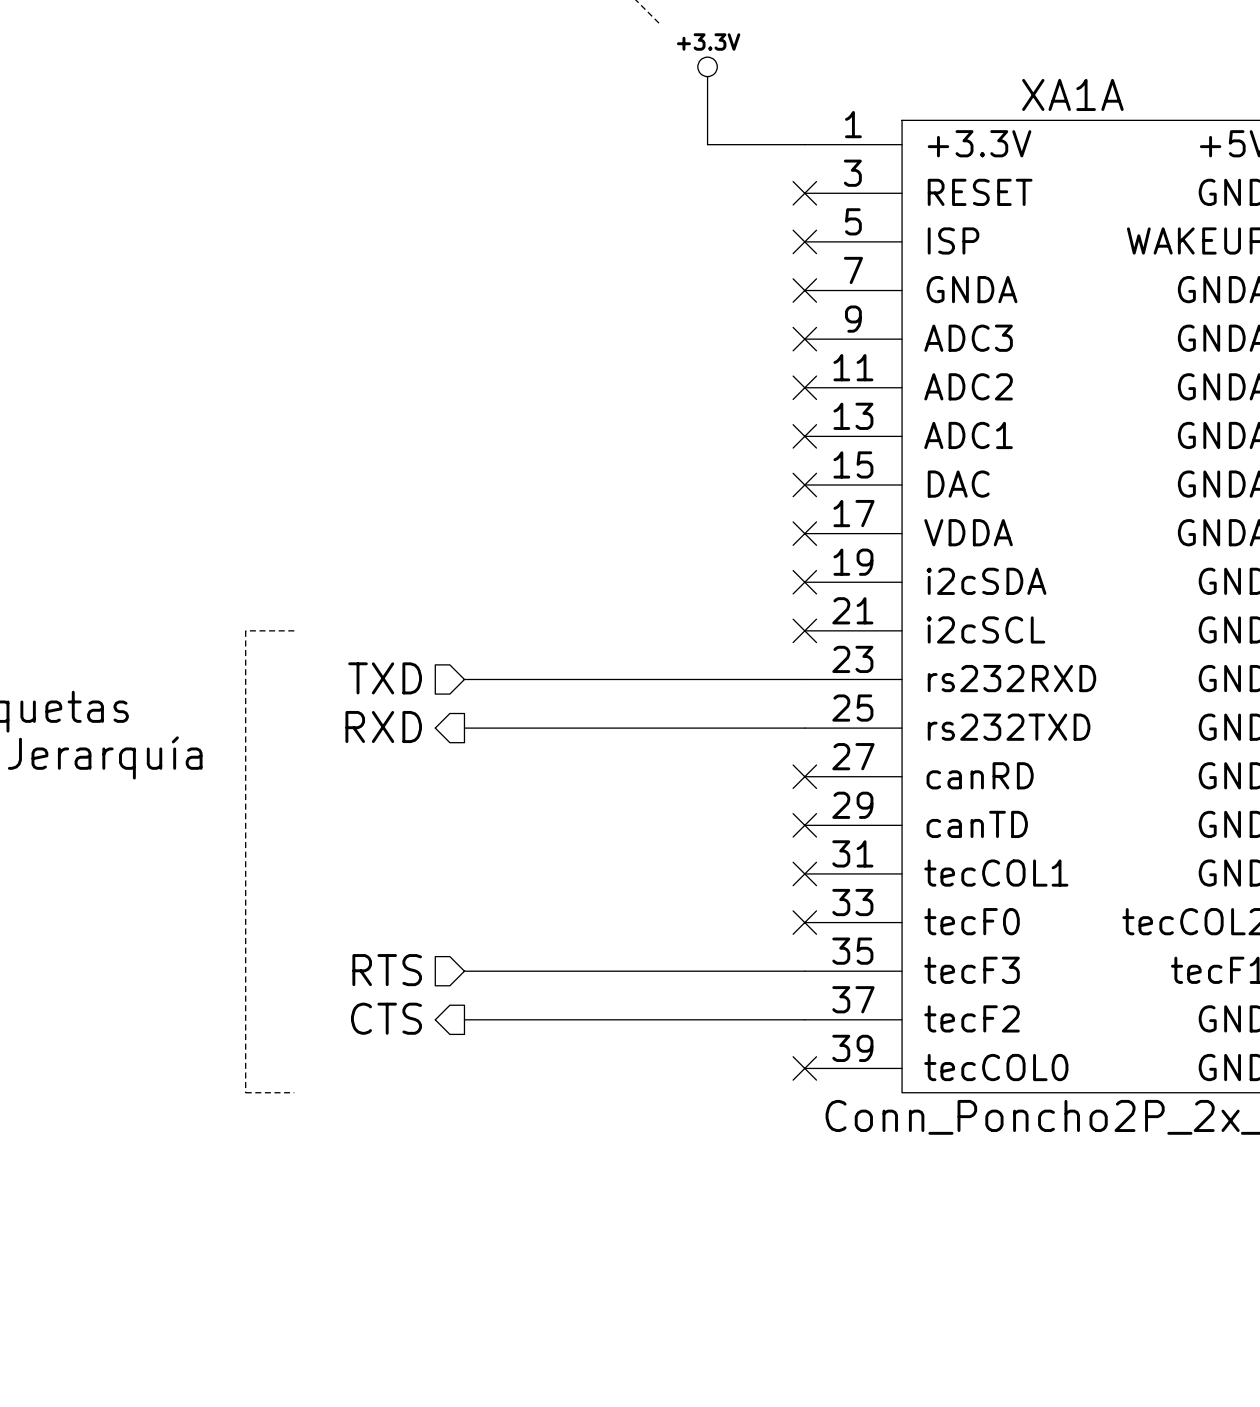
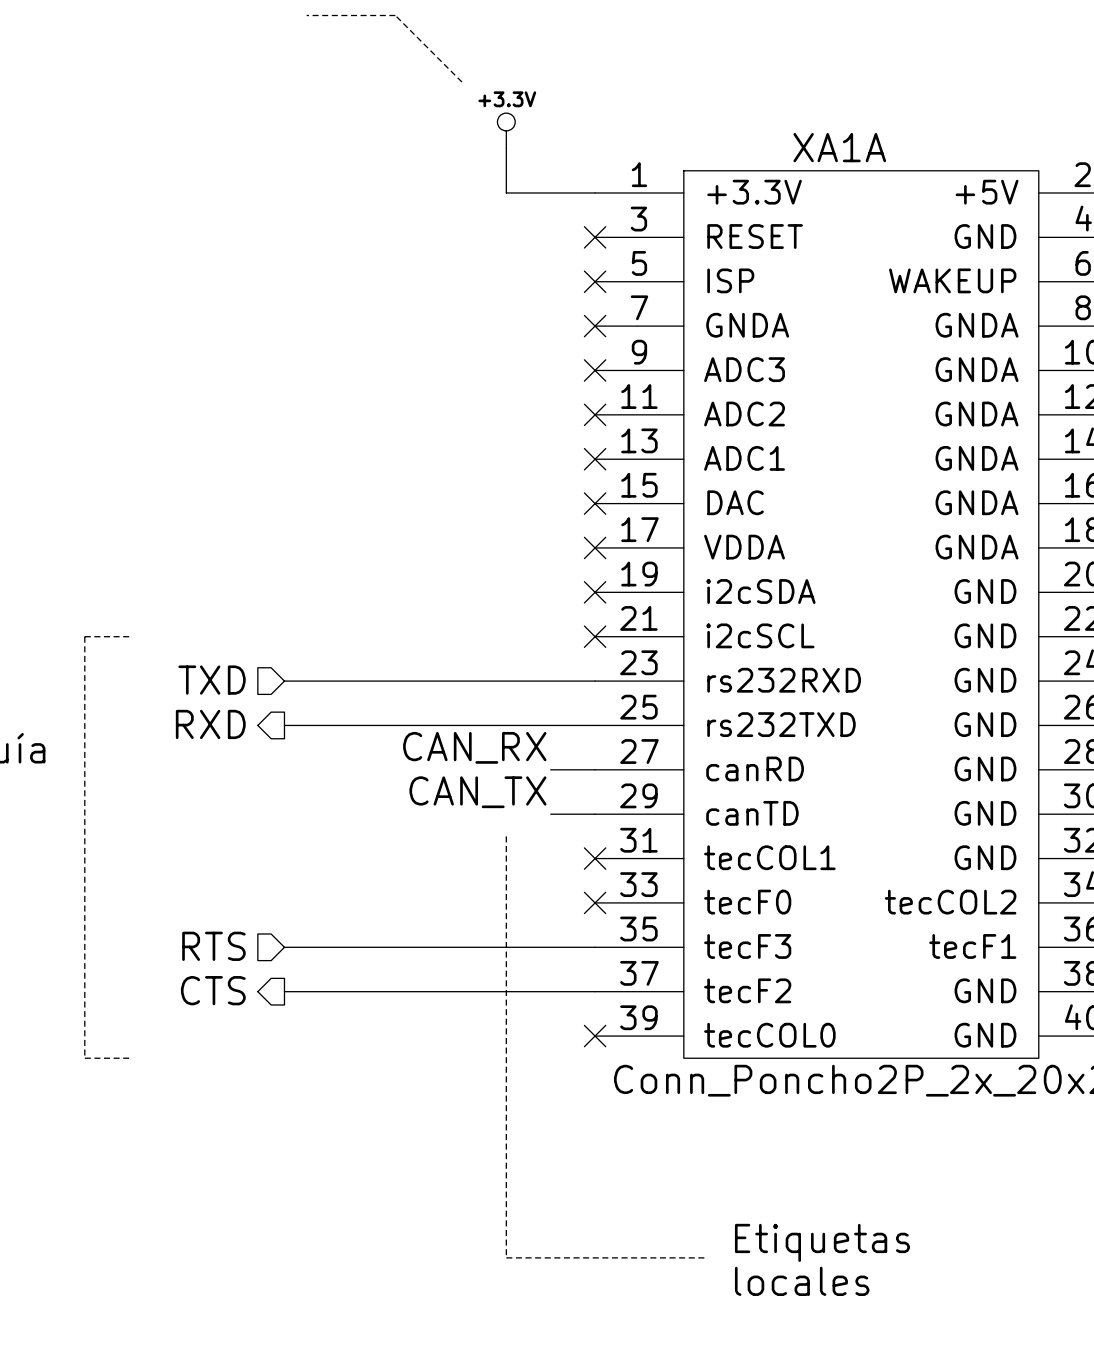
label: none -> CAN_RX (474, 747)
wire: none -> (550, 769) (595, 769)
no-connect mark: (804, 776) -> none
label: none -> CAN_TX (477, 792)
wire: none -> (550, 814) (595, 814)
no-connect mark: (804, 825) -> none
line: none -> (506, 836) (506, 1257) (706, 1257)
text: none -> Etiquetas (822, 1242)
text: none -> locales (802, 1281)

